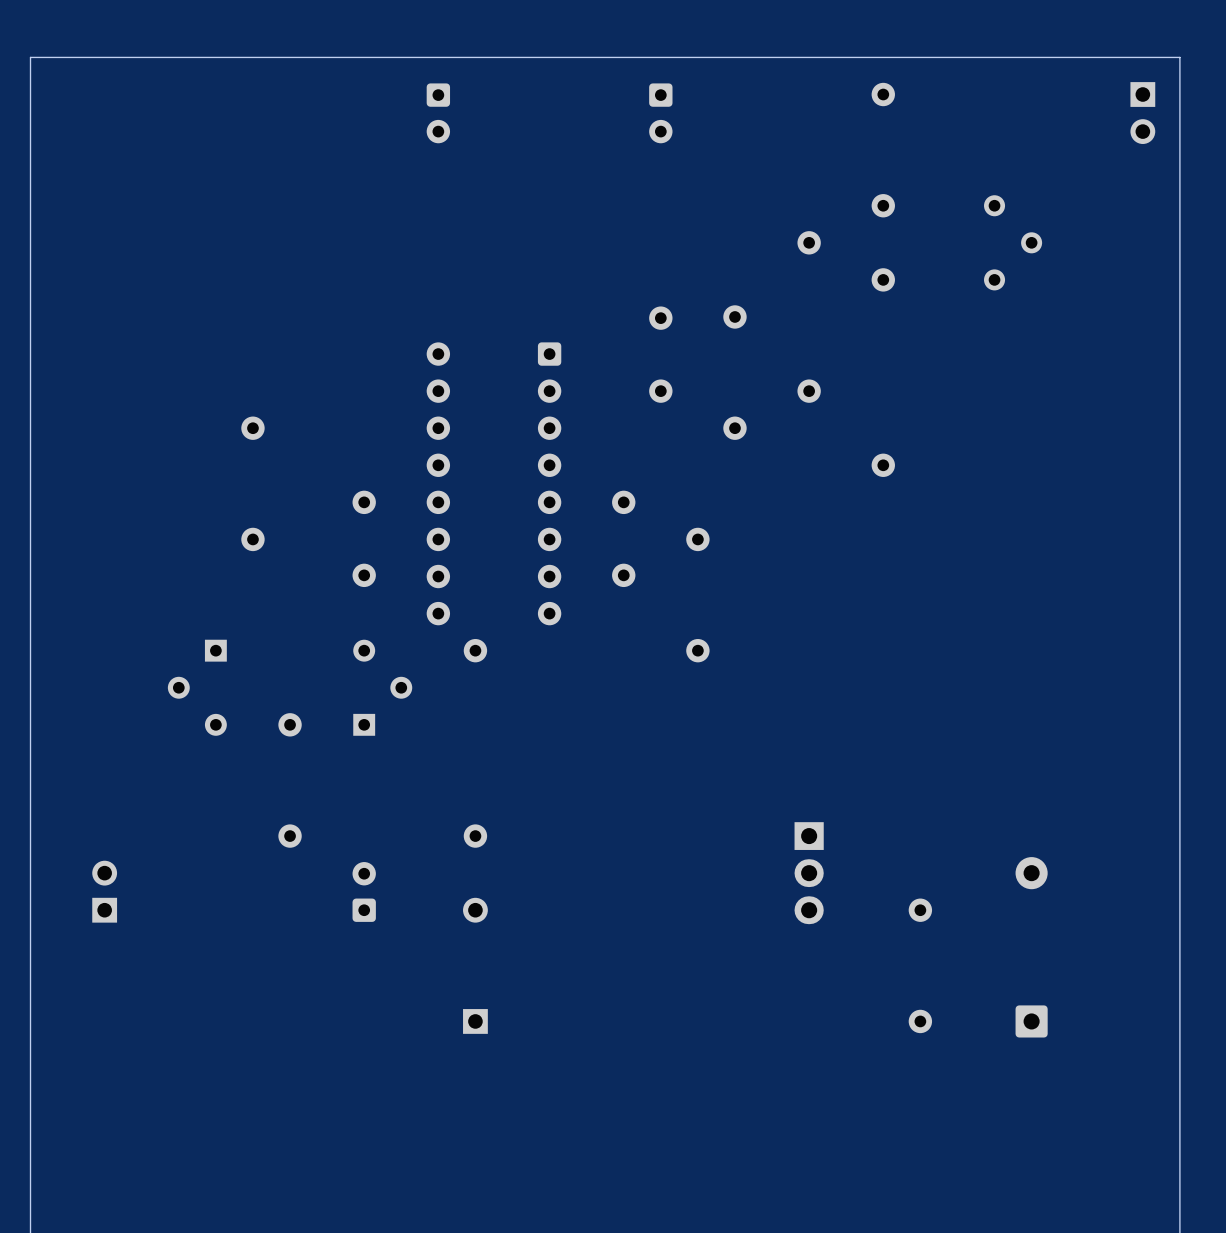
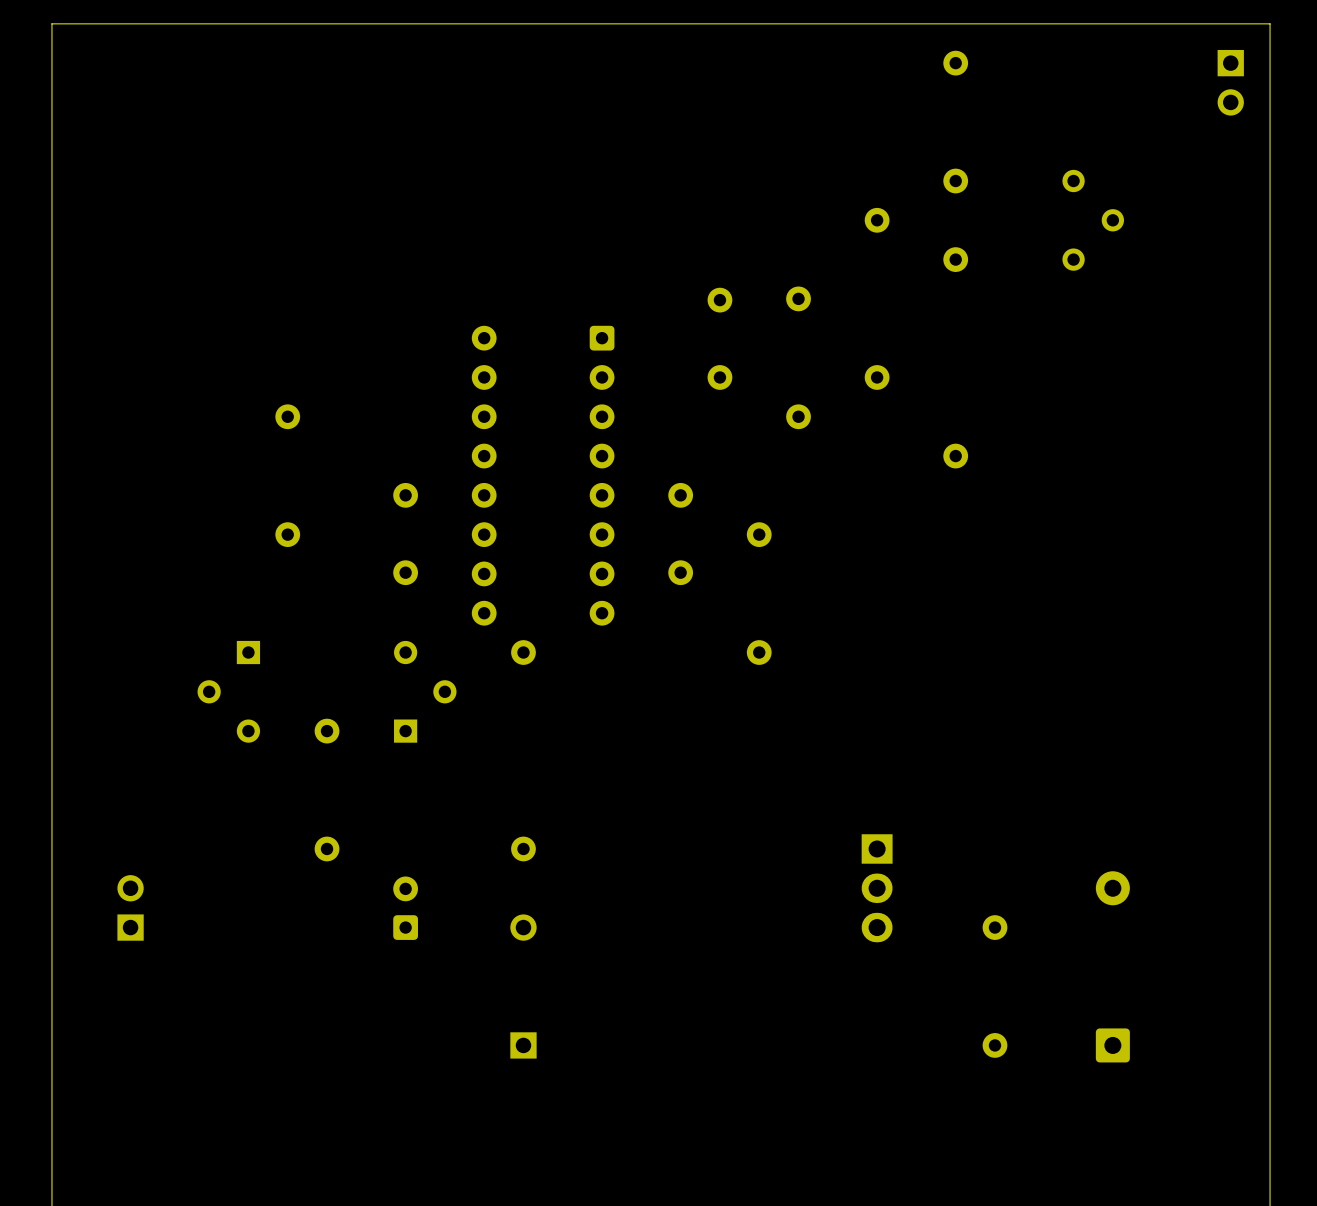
part: (438, 113) -> none
part: (660, 113) -> none

